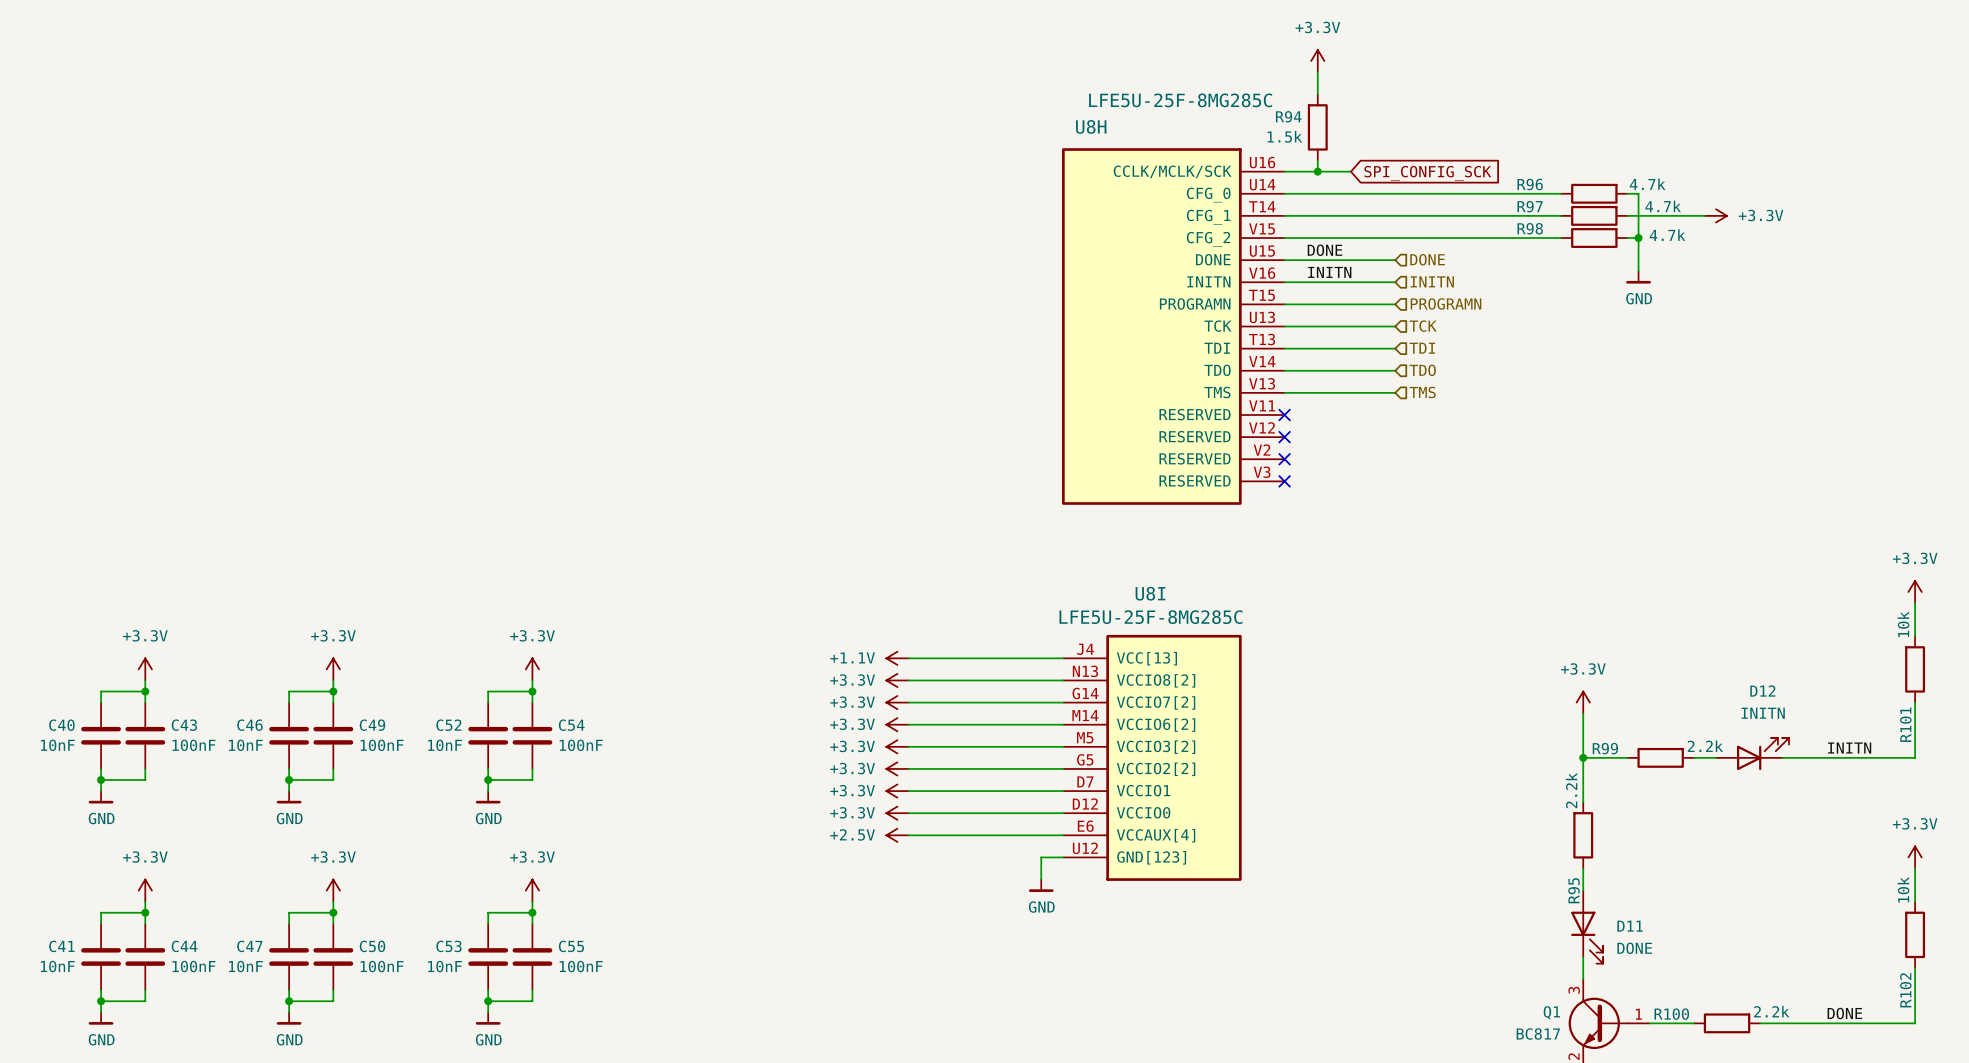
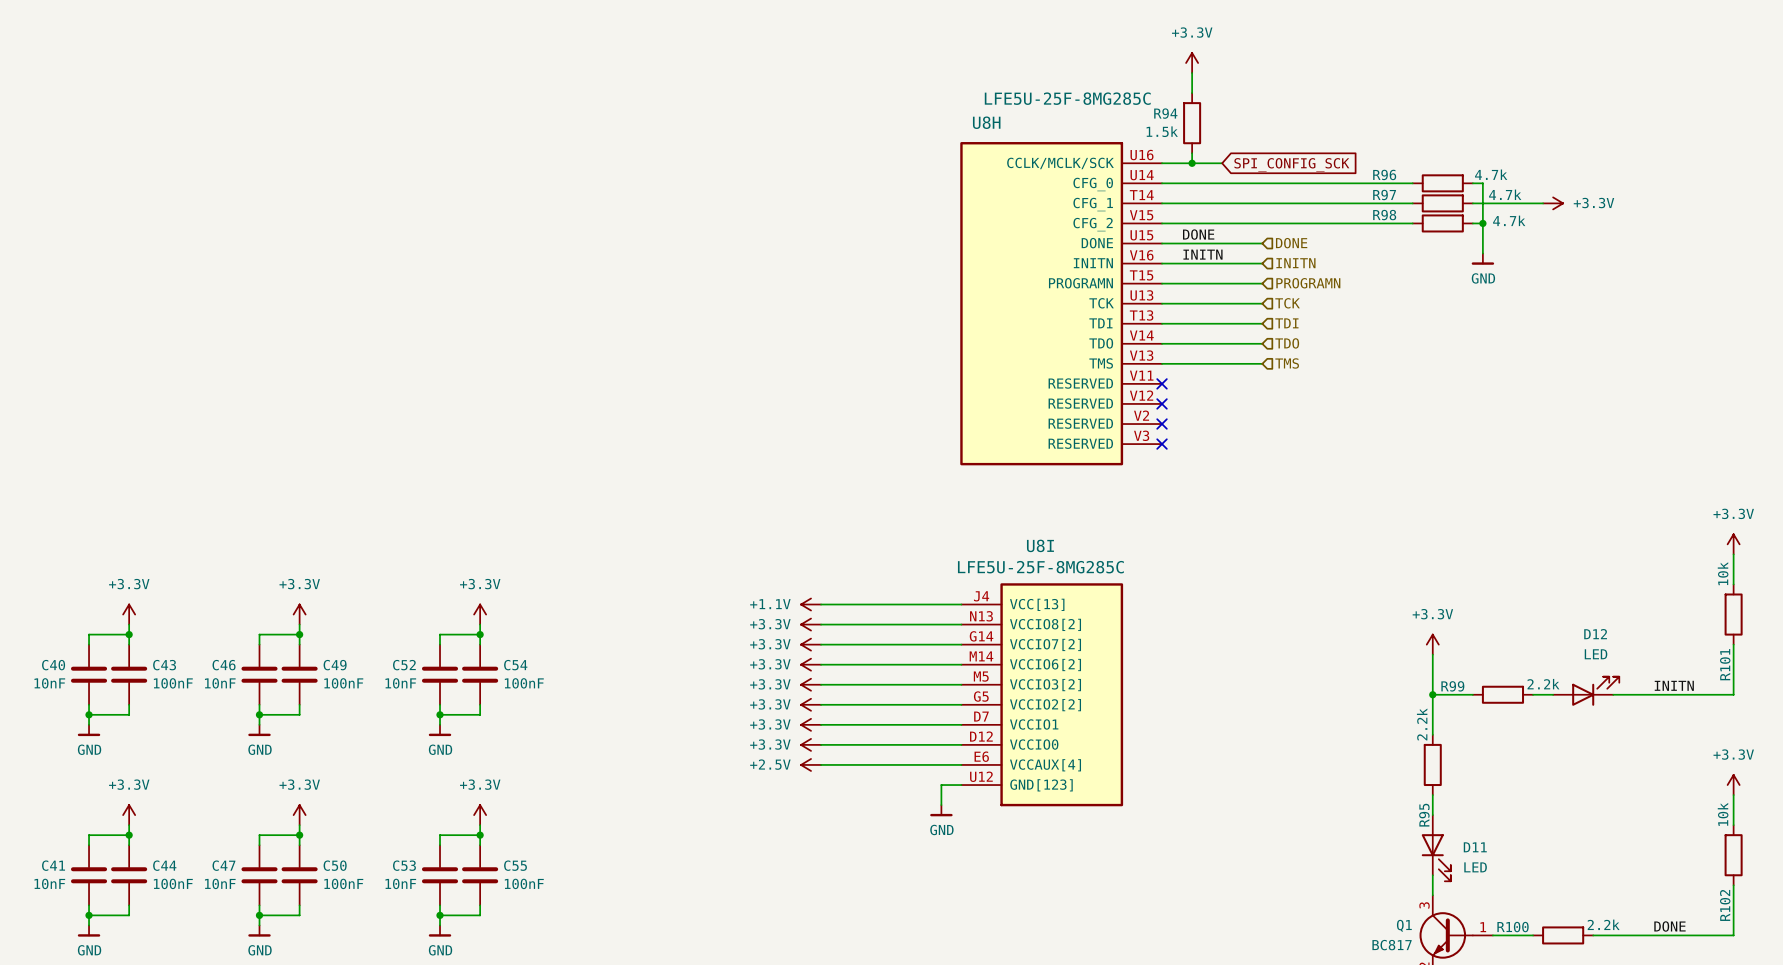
D12 value: INITN (1763, 713) -> LED (1596, 654)
D11 value: DONE (1634, 948) -> LED (1475, 867)

